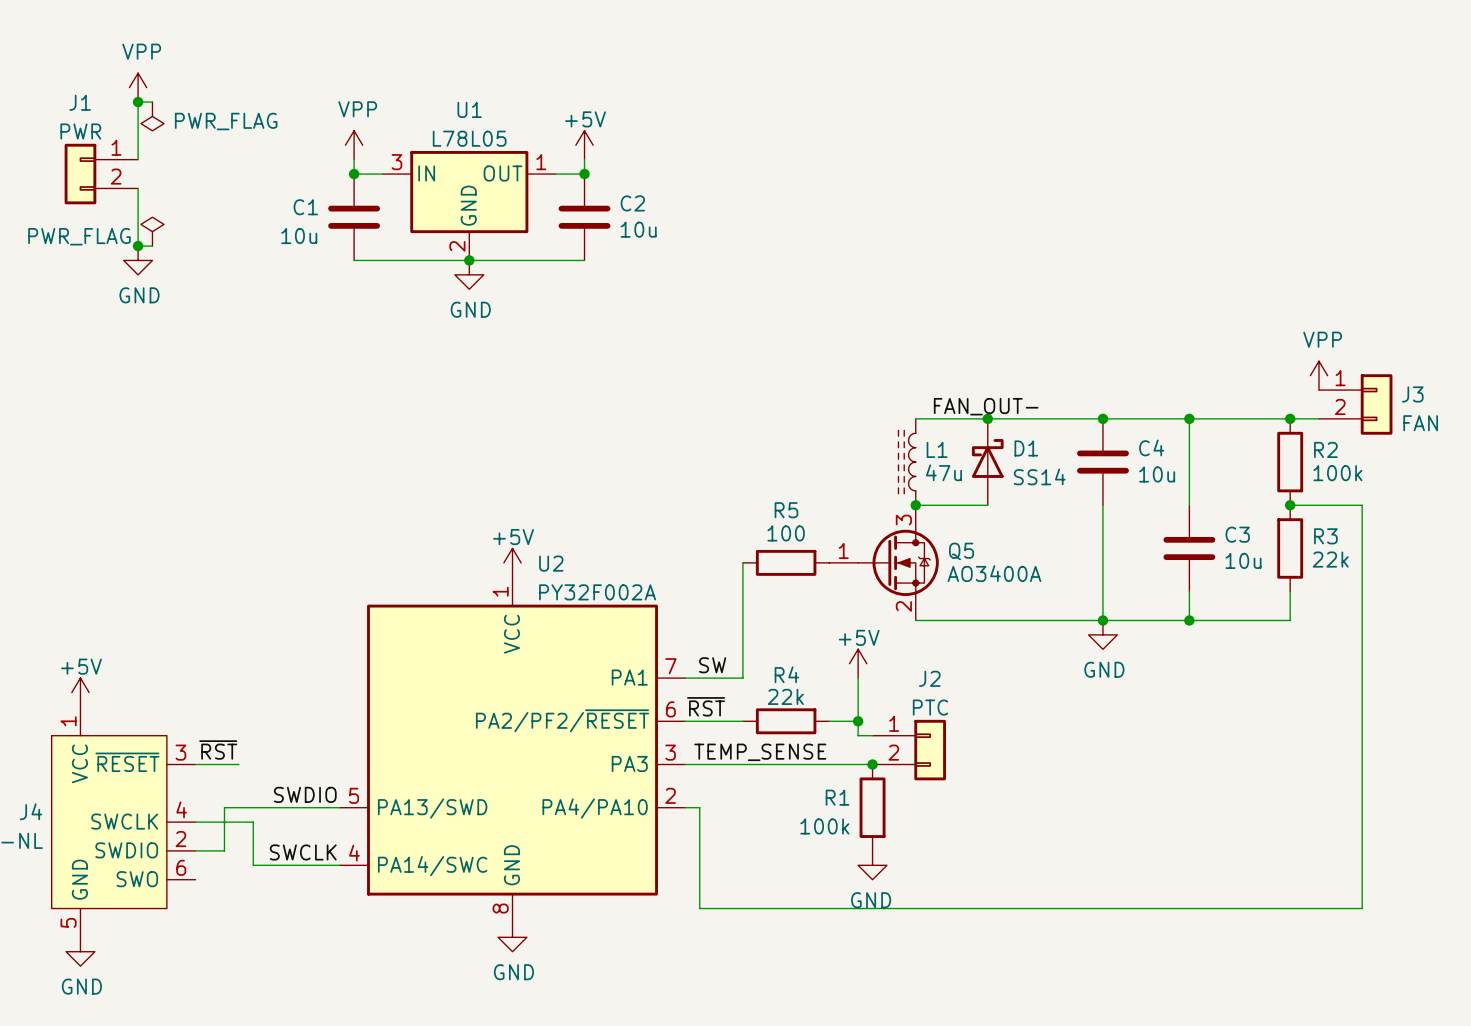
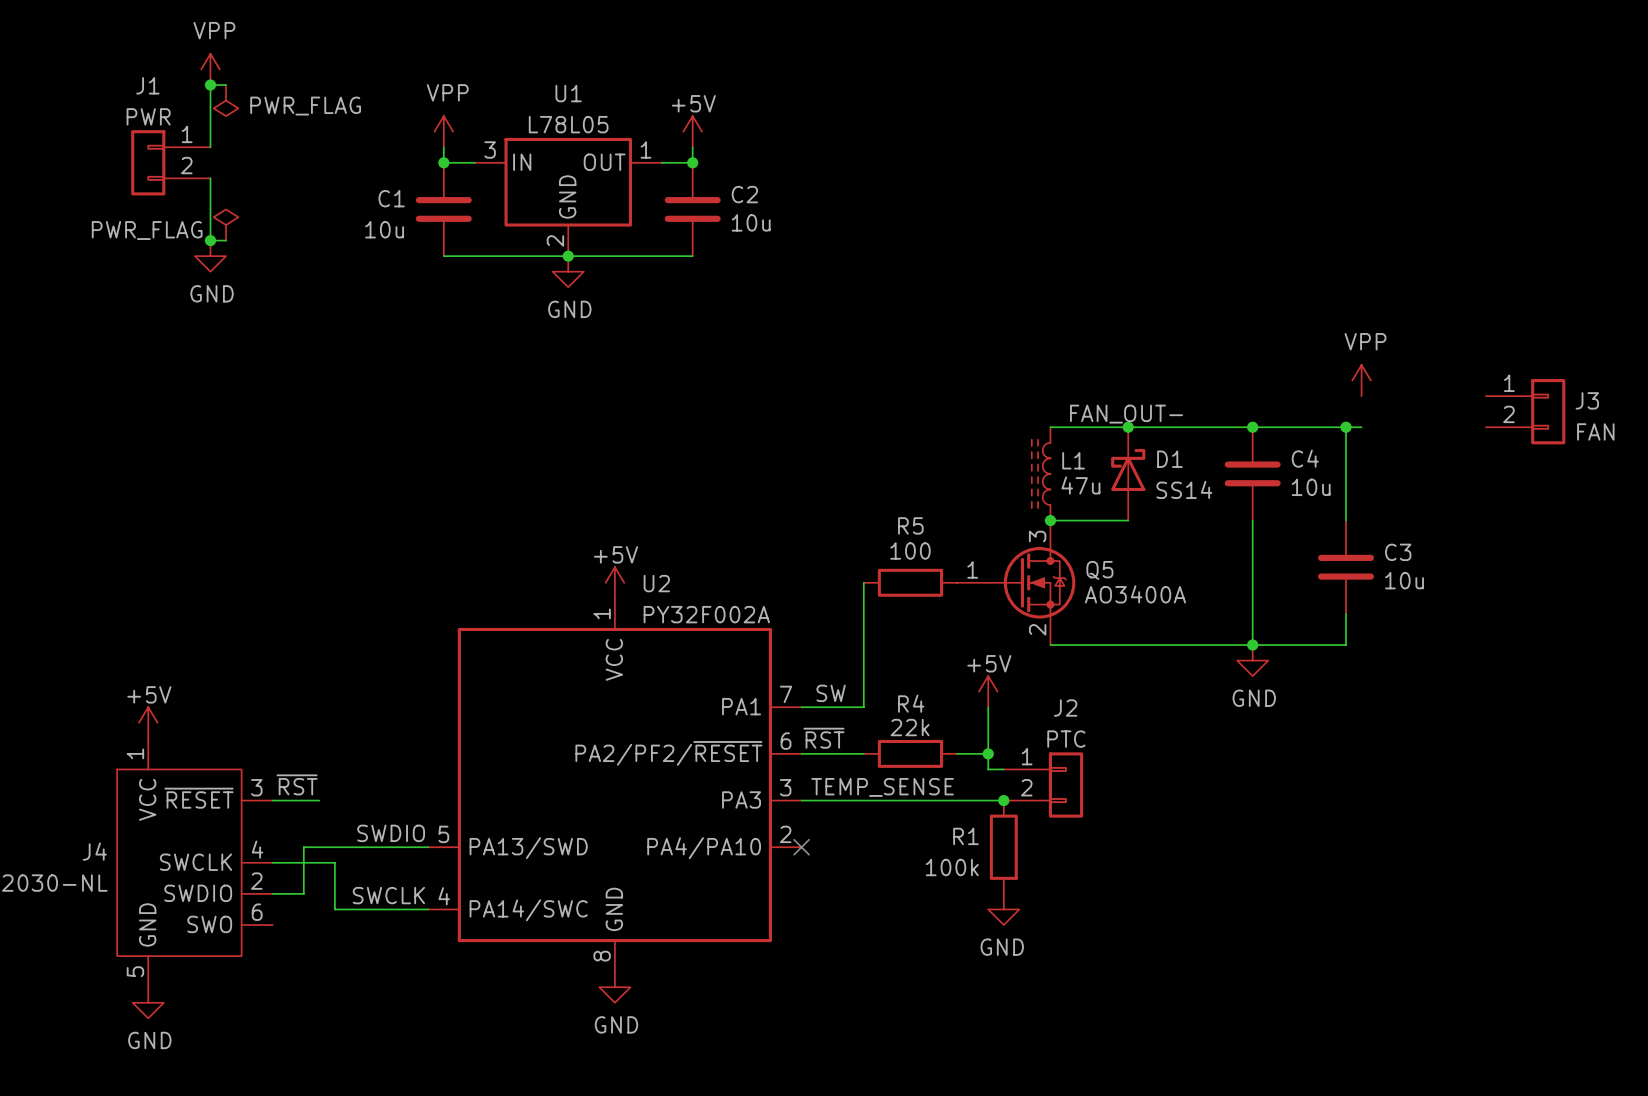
power symbol position: VPP (1318, 375) -> VPP (1361, 380)
wire: (1203, 418) (1318, 418) -> none
junction: (1290, 418) -> none
R2: 100k (1290, 462) -> none
wire: (1290, 505) (1362, 505) (1362, 908) (699, 908) (699, 807) (685, 807) -> none
junction: (1290, 505) -> none
R3: 22k (1290, 548) -> none
wire: (1290, 591) (1290, 620) (1189, 620) -> none
junction: (1189, 620) -> none
no-connect mark: none -> (801, 847)

